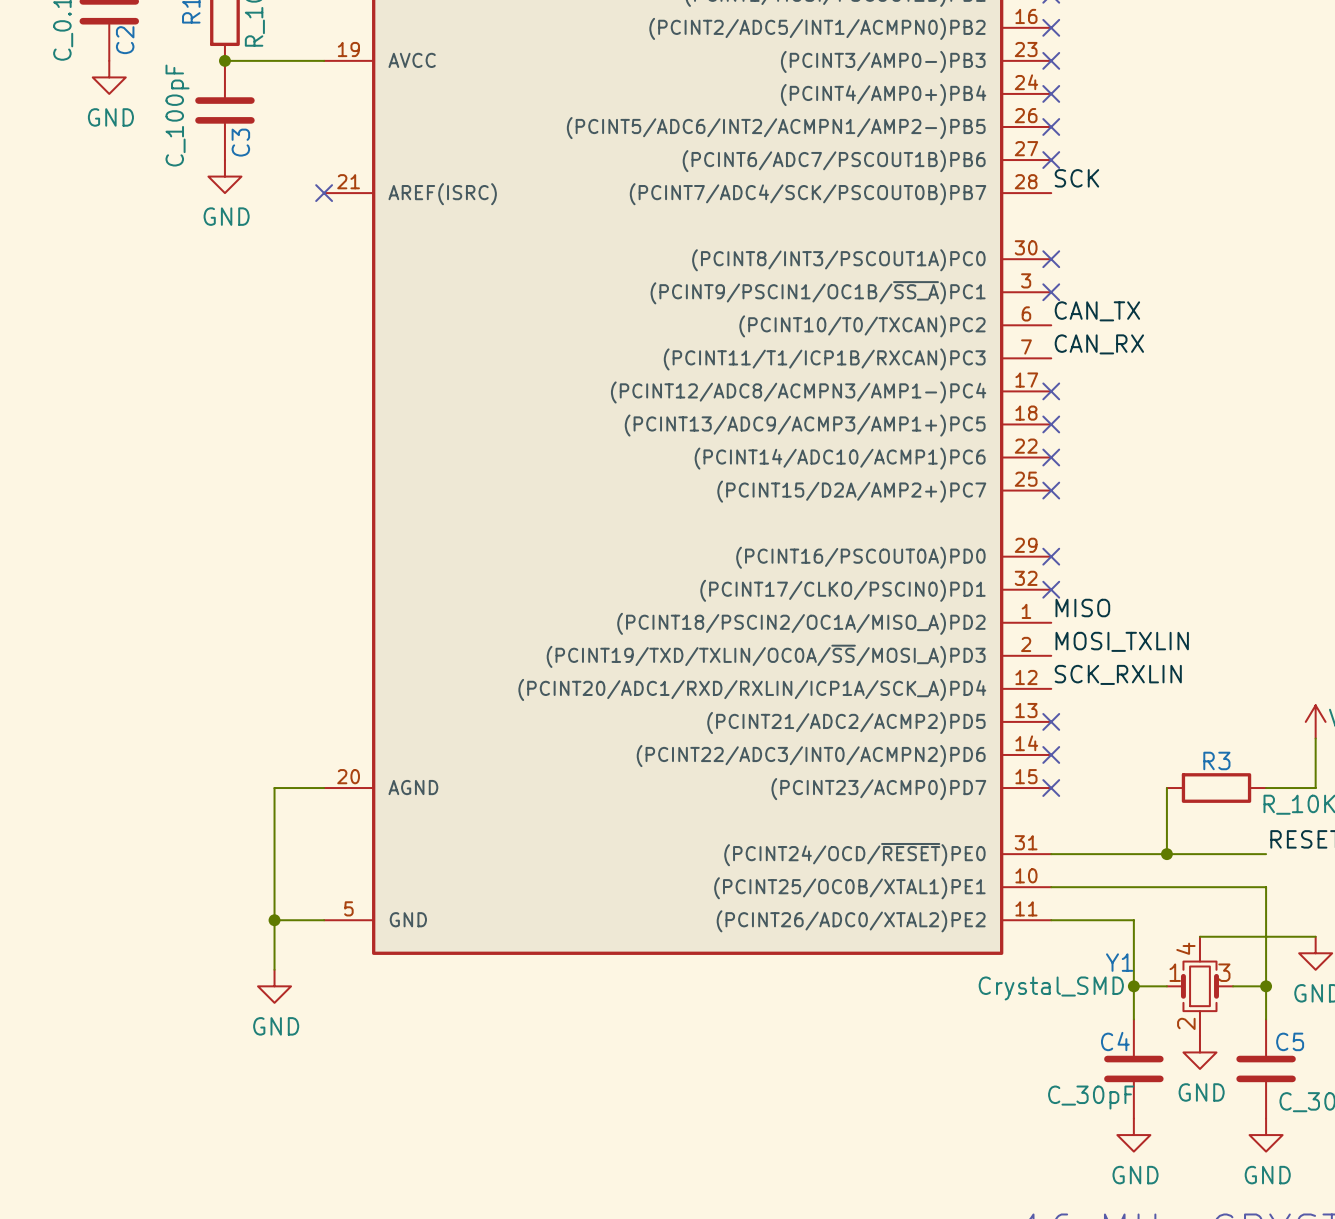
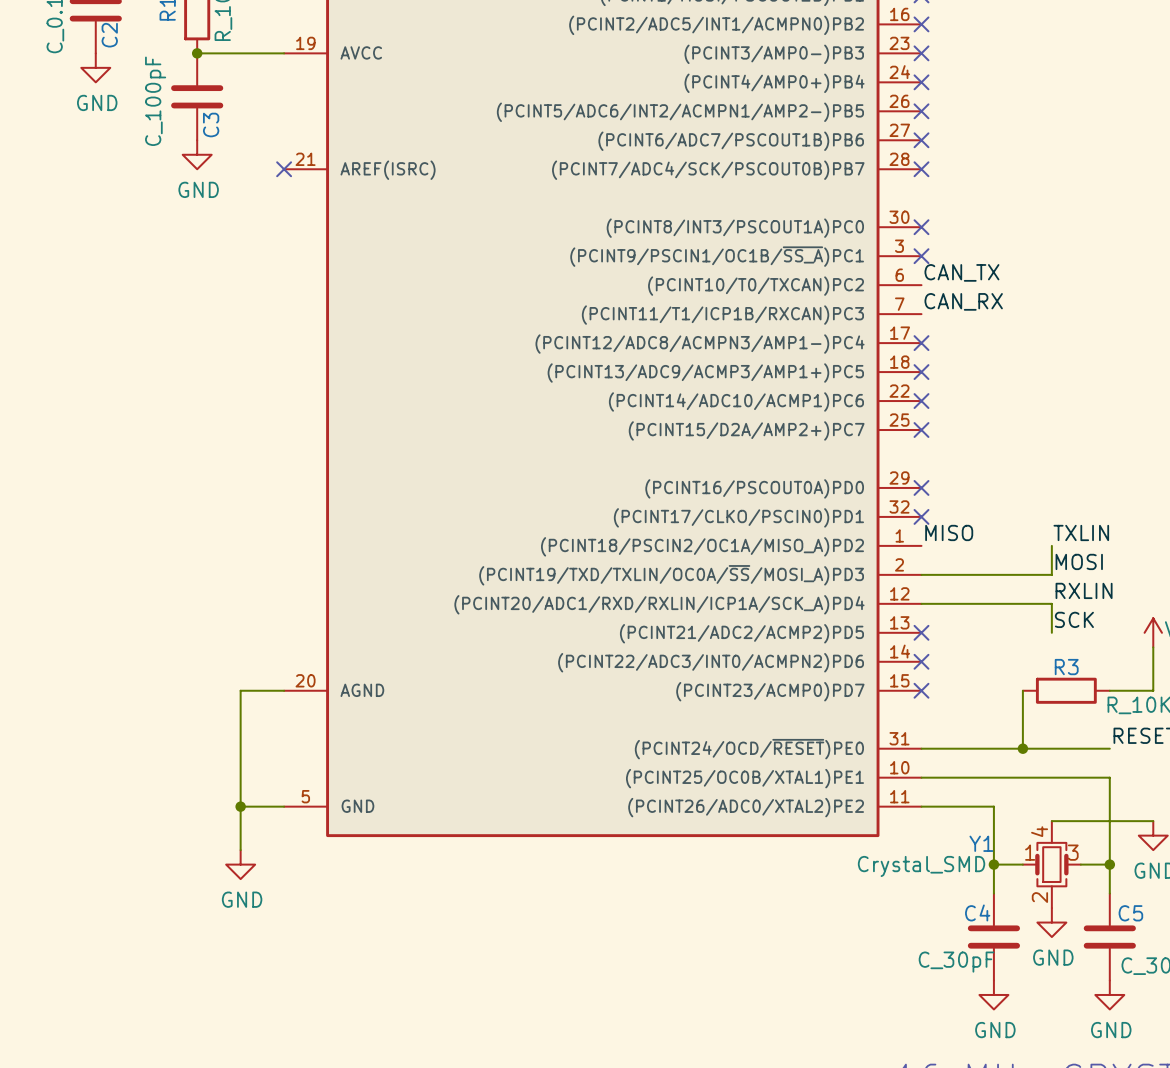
label: SCK (1076, 178) -> none
no-connect mark: none -> (921, 169)
wire: none -> (1051, 545) (1051, 574) (921, 574)
label: MOSI_TXLIN (1122, 641) -> TXLIN (1081, 532)
label: none -> MOSI (1079, 561)
label: SCK_RXLIN (1118, 674) -> RXLIN (1084, 590)
wire: none -> (921, 603) (1051, 603) (1051, 632)
label: none -> SCK (1074, 619)

